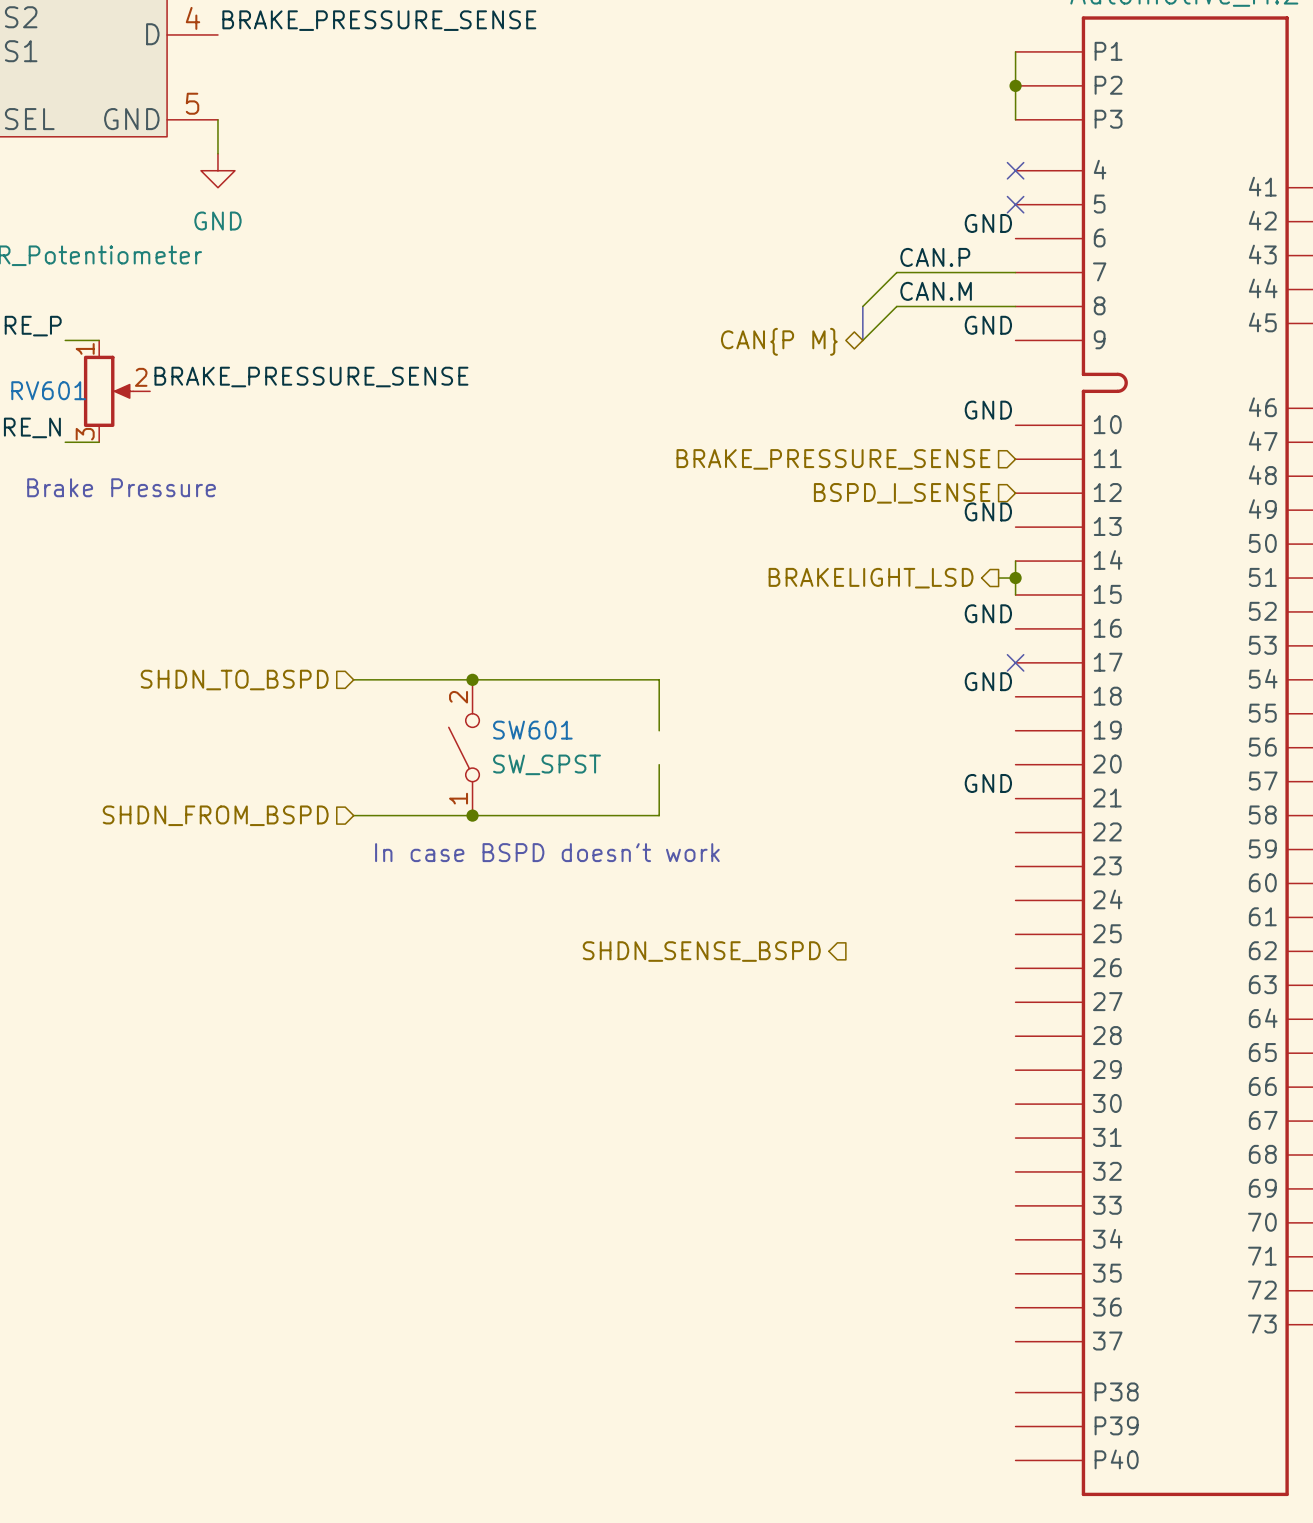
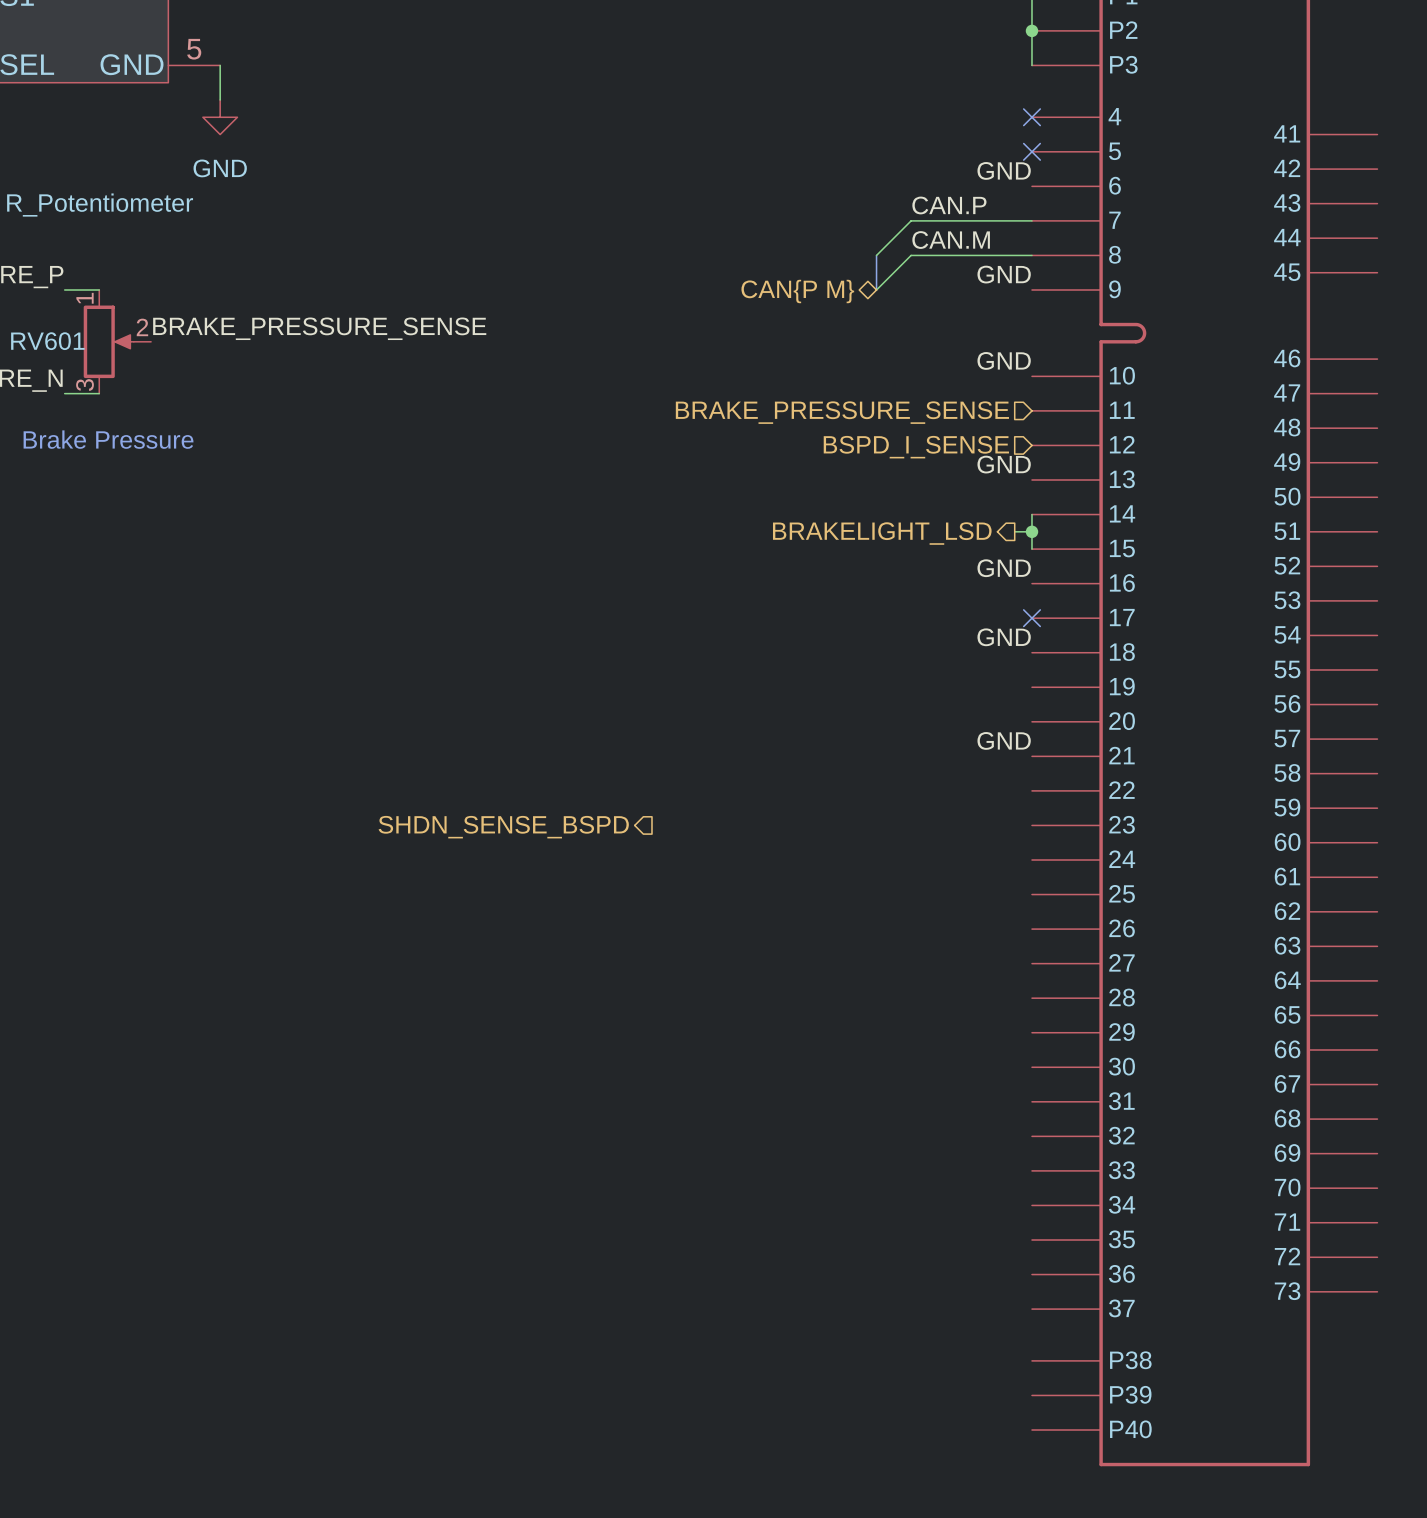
wire: (353, 679) (659, 679) (659, 730) -> none
junction: (472, 679) -> none
hierarchical label: SHDN_TO_BSPD (234, 680) -> none
SW601: SW_SPST (464, 747) -> none
wire: (659, 764) (659, 815) (353, 815) -> none
hierarchical label: SHDN_FROM_BSPD (215, 815) -> none
junction: (472, 815) -> none
text: In case BSPD doesn't work (547, 852) -> none
hierarchical label position: SHDN_SENSE_BSPD (701, 951) -> SHDN_SENSE_BSPD (503, 827)

